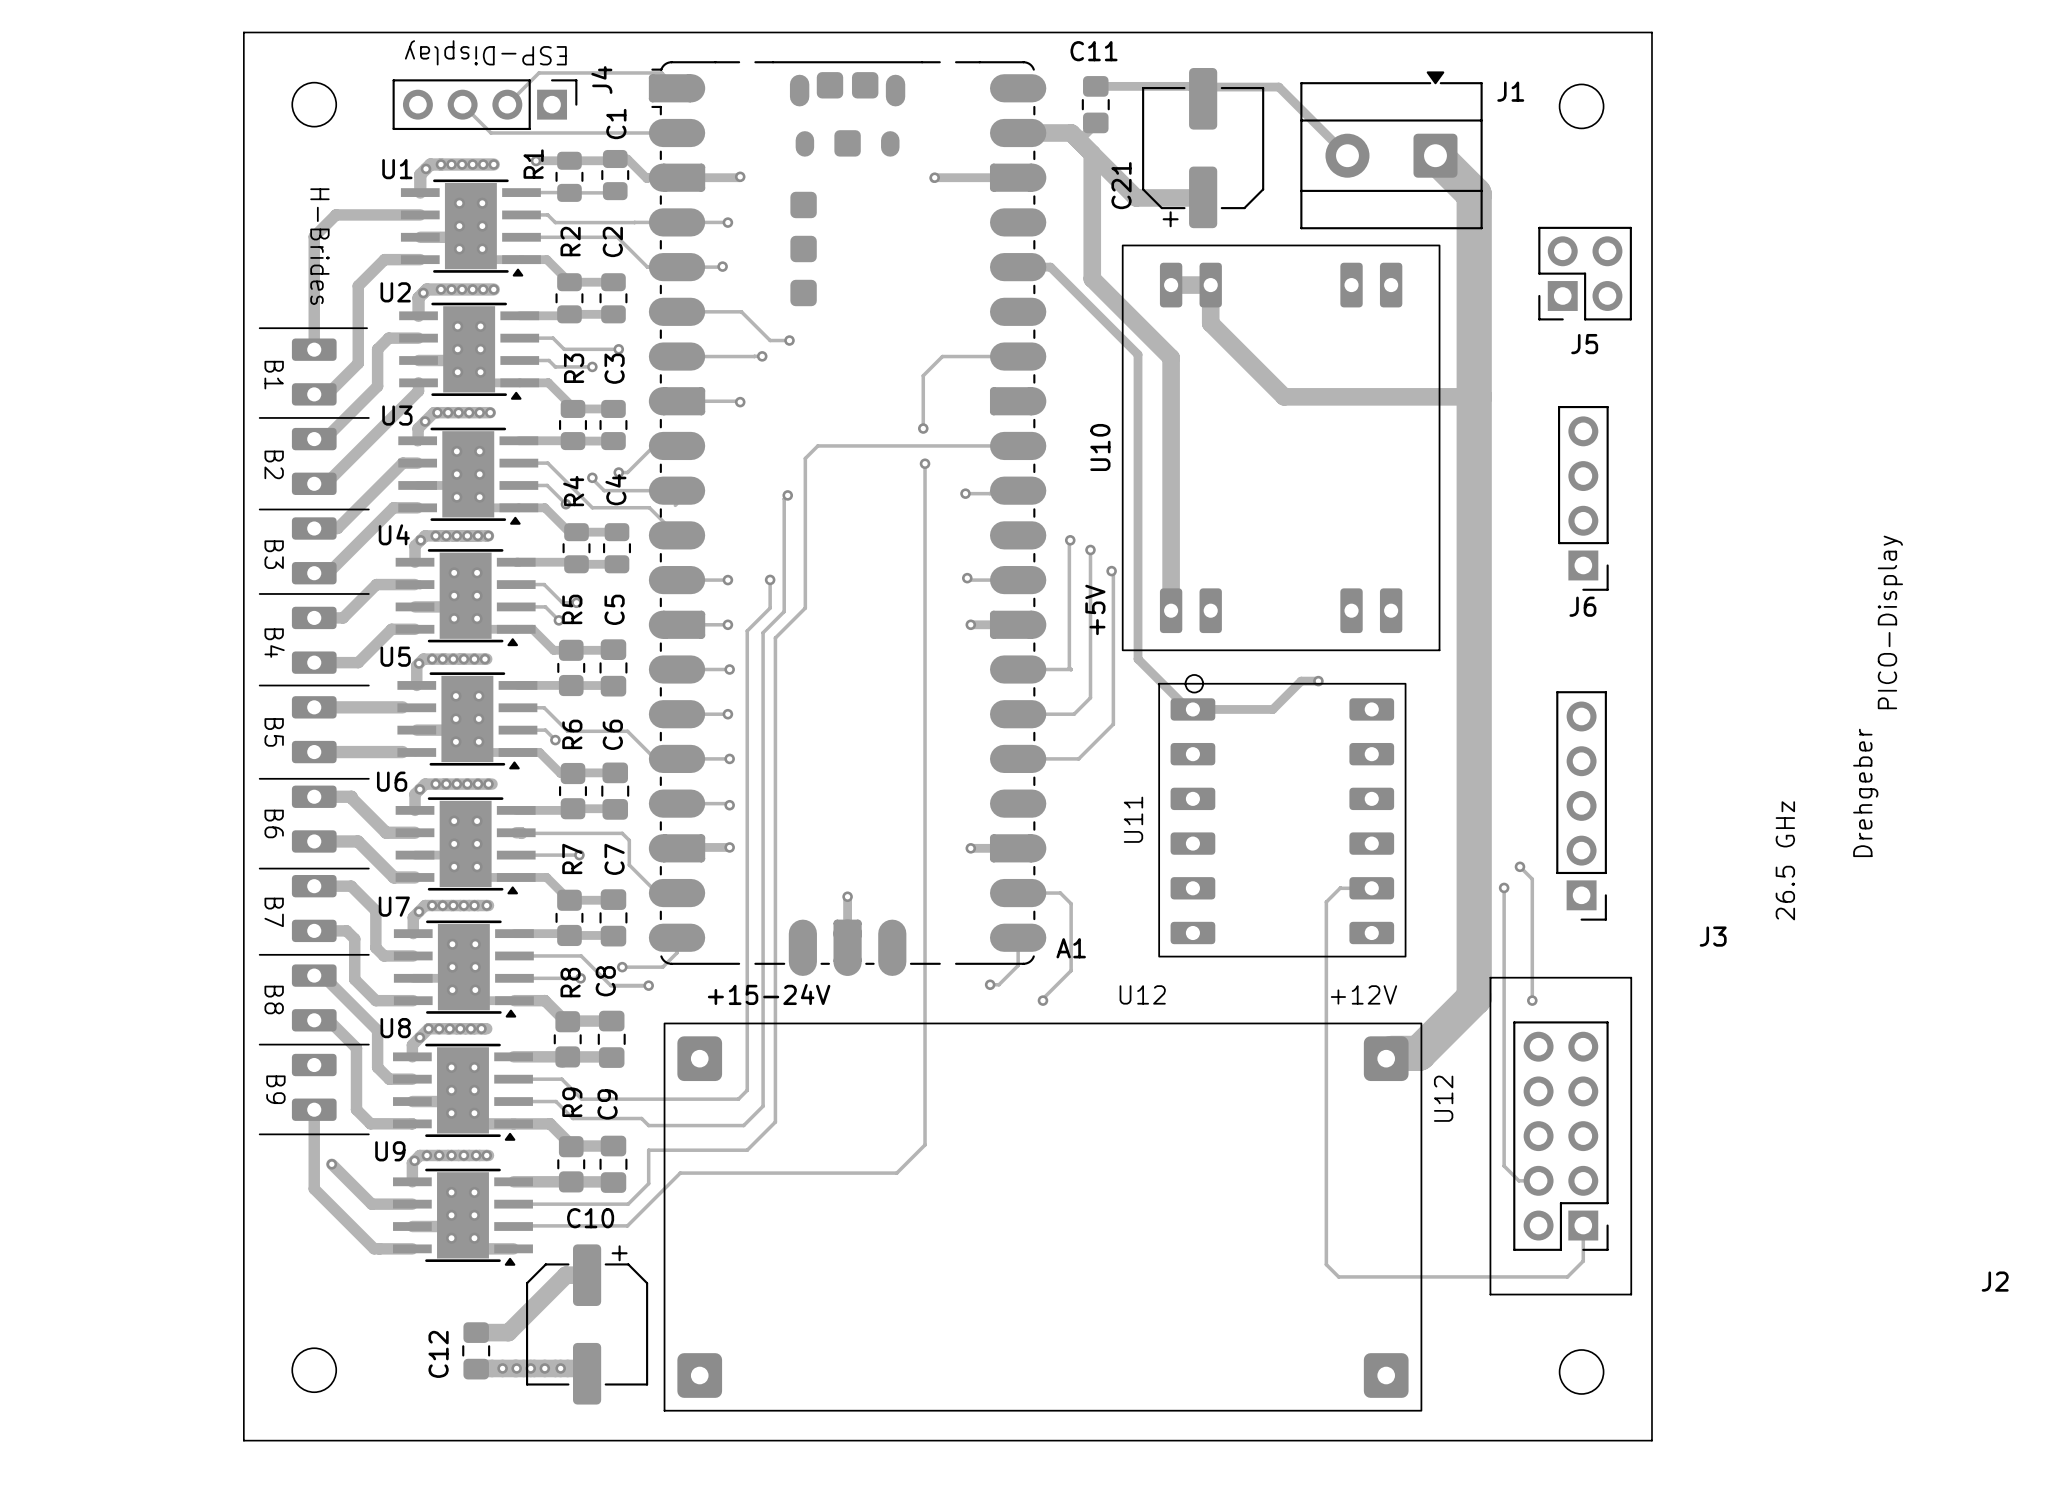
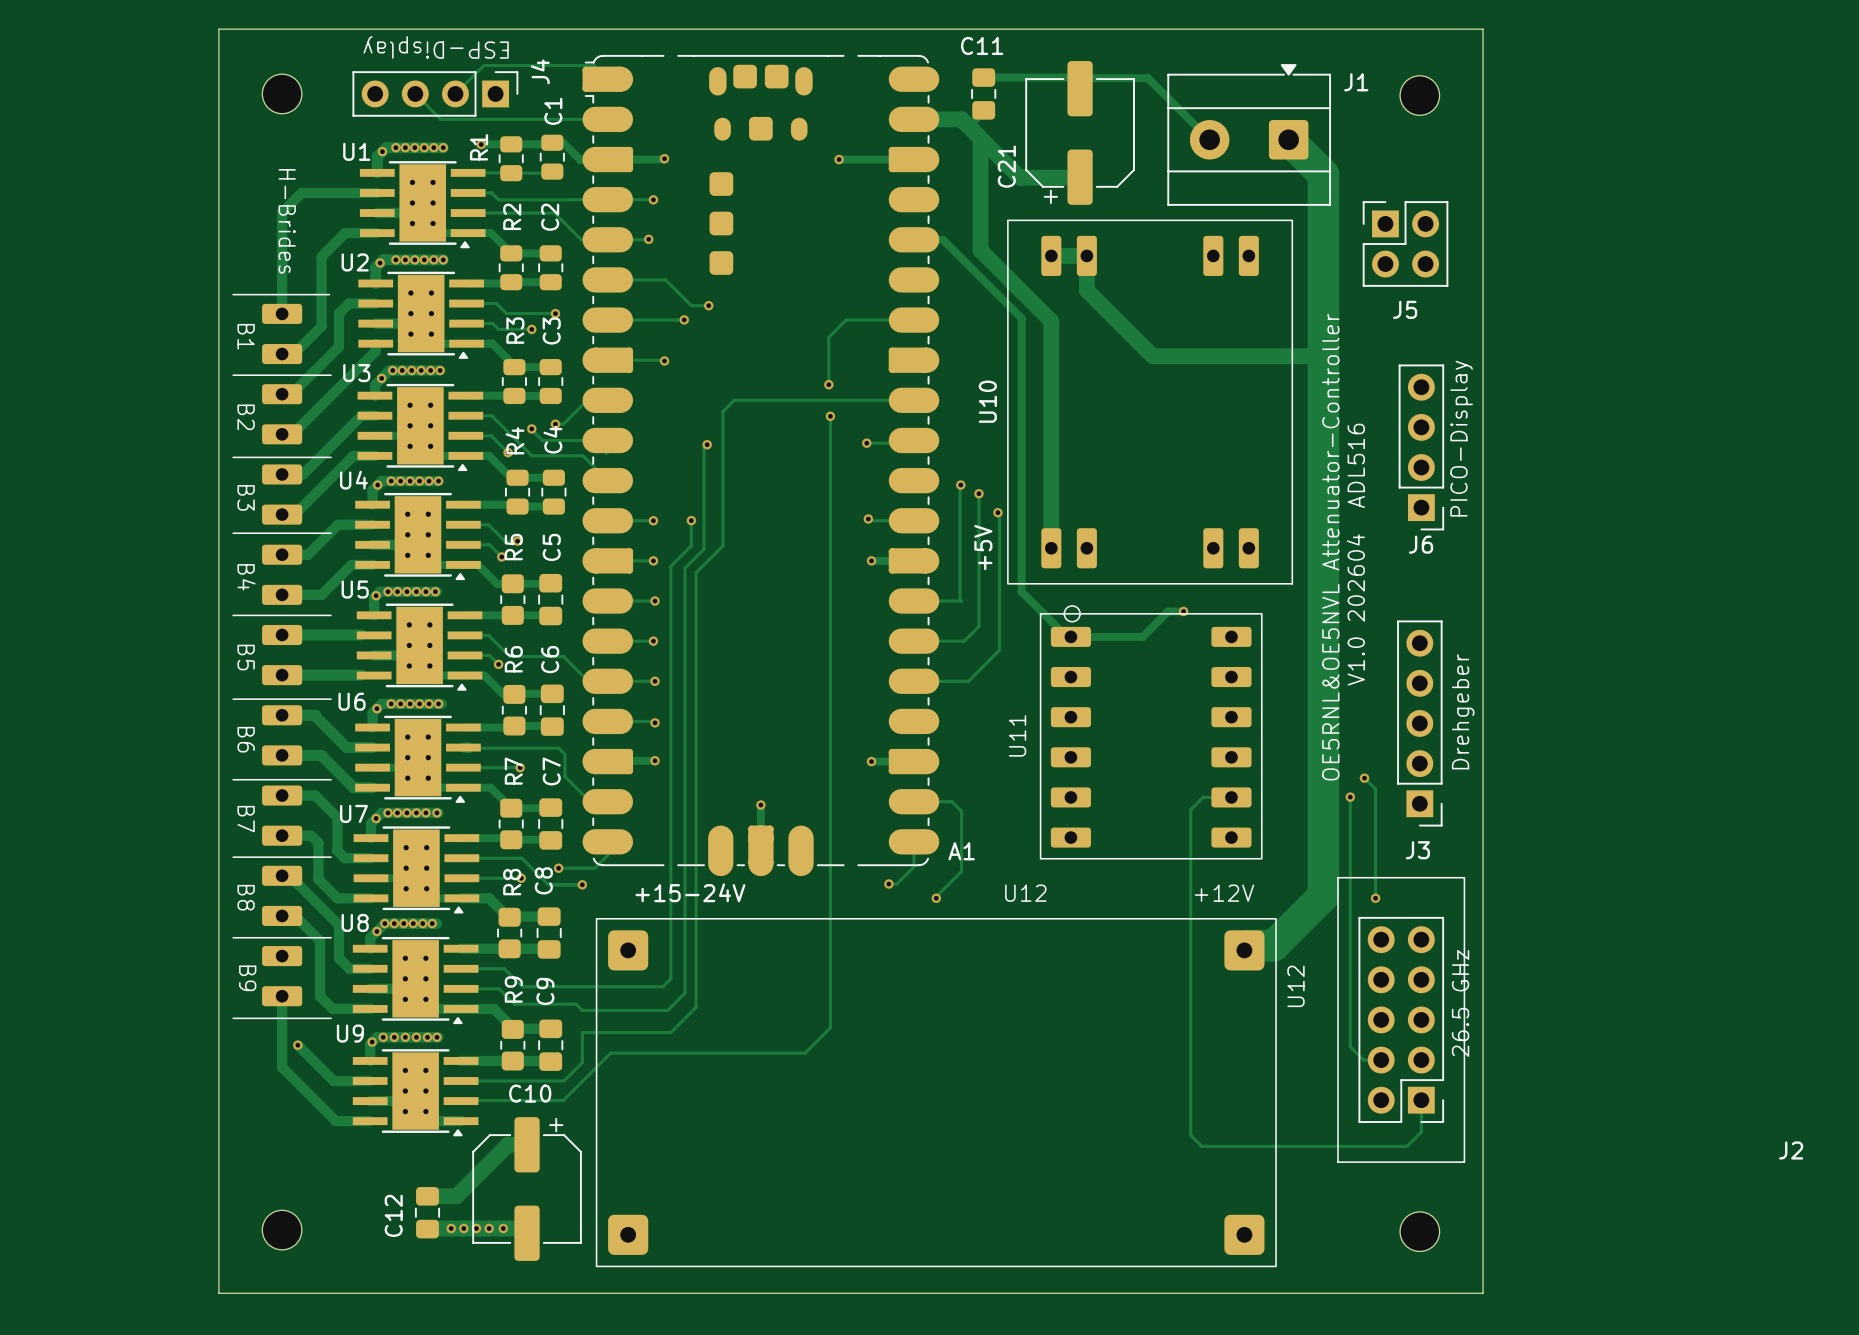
J5 footprint: [1538, 226, 1632, 321] -> [1362, 201, 1449, 287]
text: none -> OE5RNL&OE5NVL Attenuator-Controller (1330, 547)
text: none -> V1.0 202604 ADL516 (1355, 554)
text position: PICO-Display (1890, 622) -> PICO-Display (1461, 438)
text position: Drehgeber (1865, 792) -> Drehgeber (1463, 711)
text position: 26.5 GHz (1785, 860) -> 26.5 GHz (1460, 1003)
J3 name position: J3 (1713, 936) -> J3 (1417, 850)

